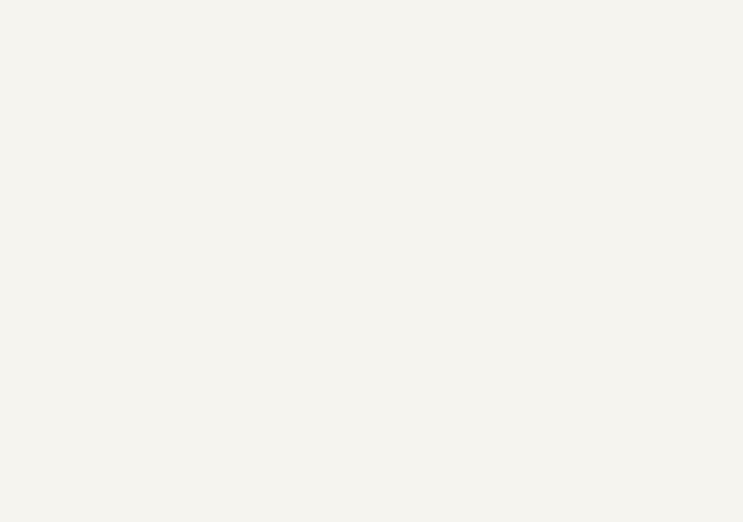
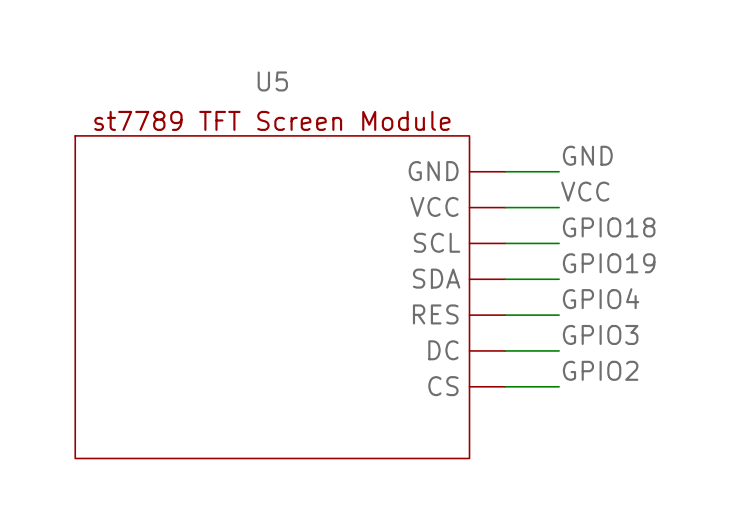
label: none -> GND (587, 155)
wire: none -> (505, 171) (559, 171)
label: none -> VCC (585, 191)
wire: none -> (505, 207) (559, 207)
label: none -> GPIO18 (609, 227)
wire: none -> (505, 243) (559, 243)
label: none -> GPIO19 (609, 263)
wire: none -> (505, 279) (559, 279)
U5: none -> (290, 297)
label: none -> GPIO4 (601, 298)
wire: none -> (505, 315) (559, 315)
label: none -> GPIO3 (600, 334)
wire: none -> (505, 350) (559, 350)
label: none -> GPIO2 (600, 370)
wire: none -> (505, 386) (559, 386)

